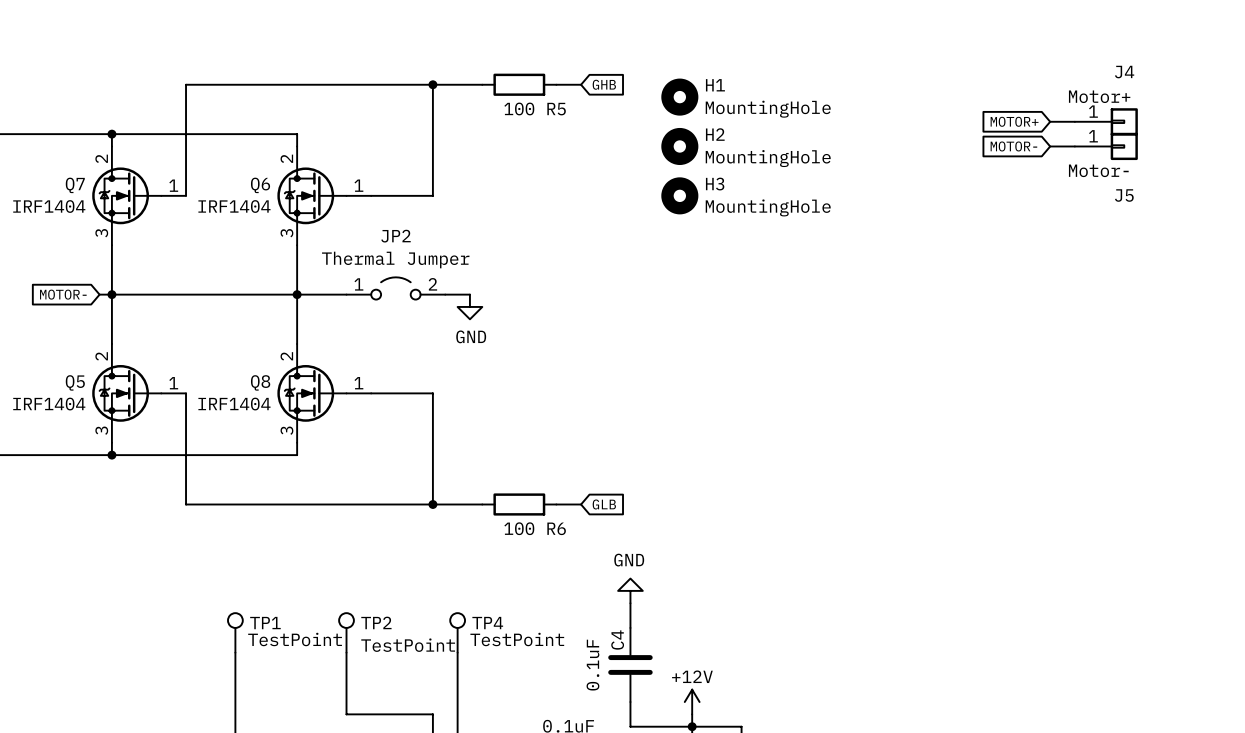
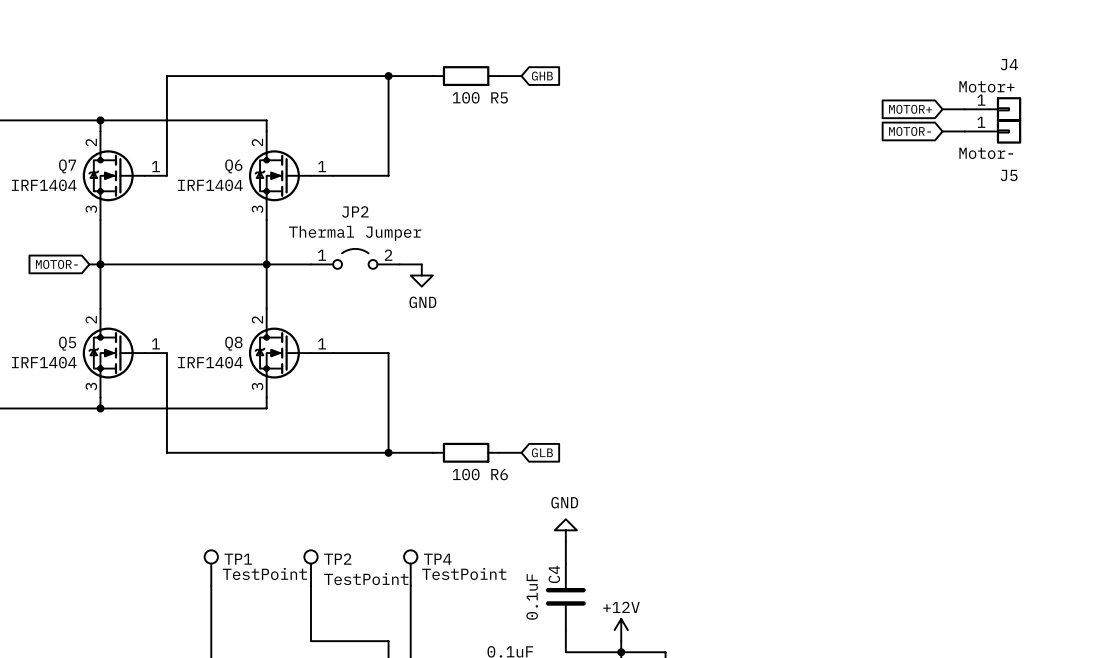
H1: MountingHole (679, 97) -> none
H2: MountingHole (679, 146) -> none
H3: MountingHole (679, 195) -> none

